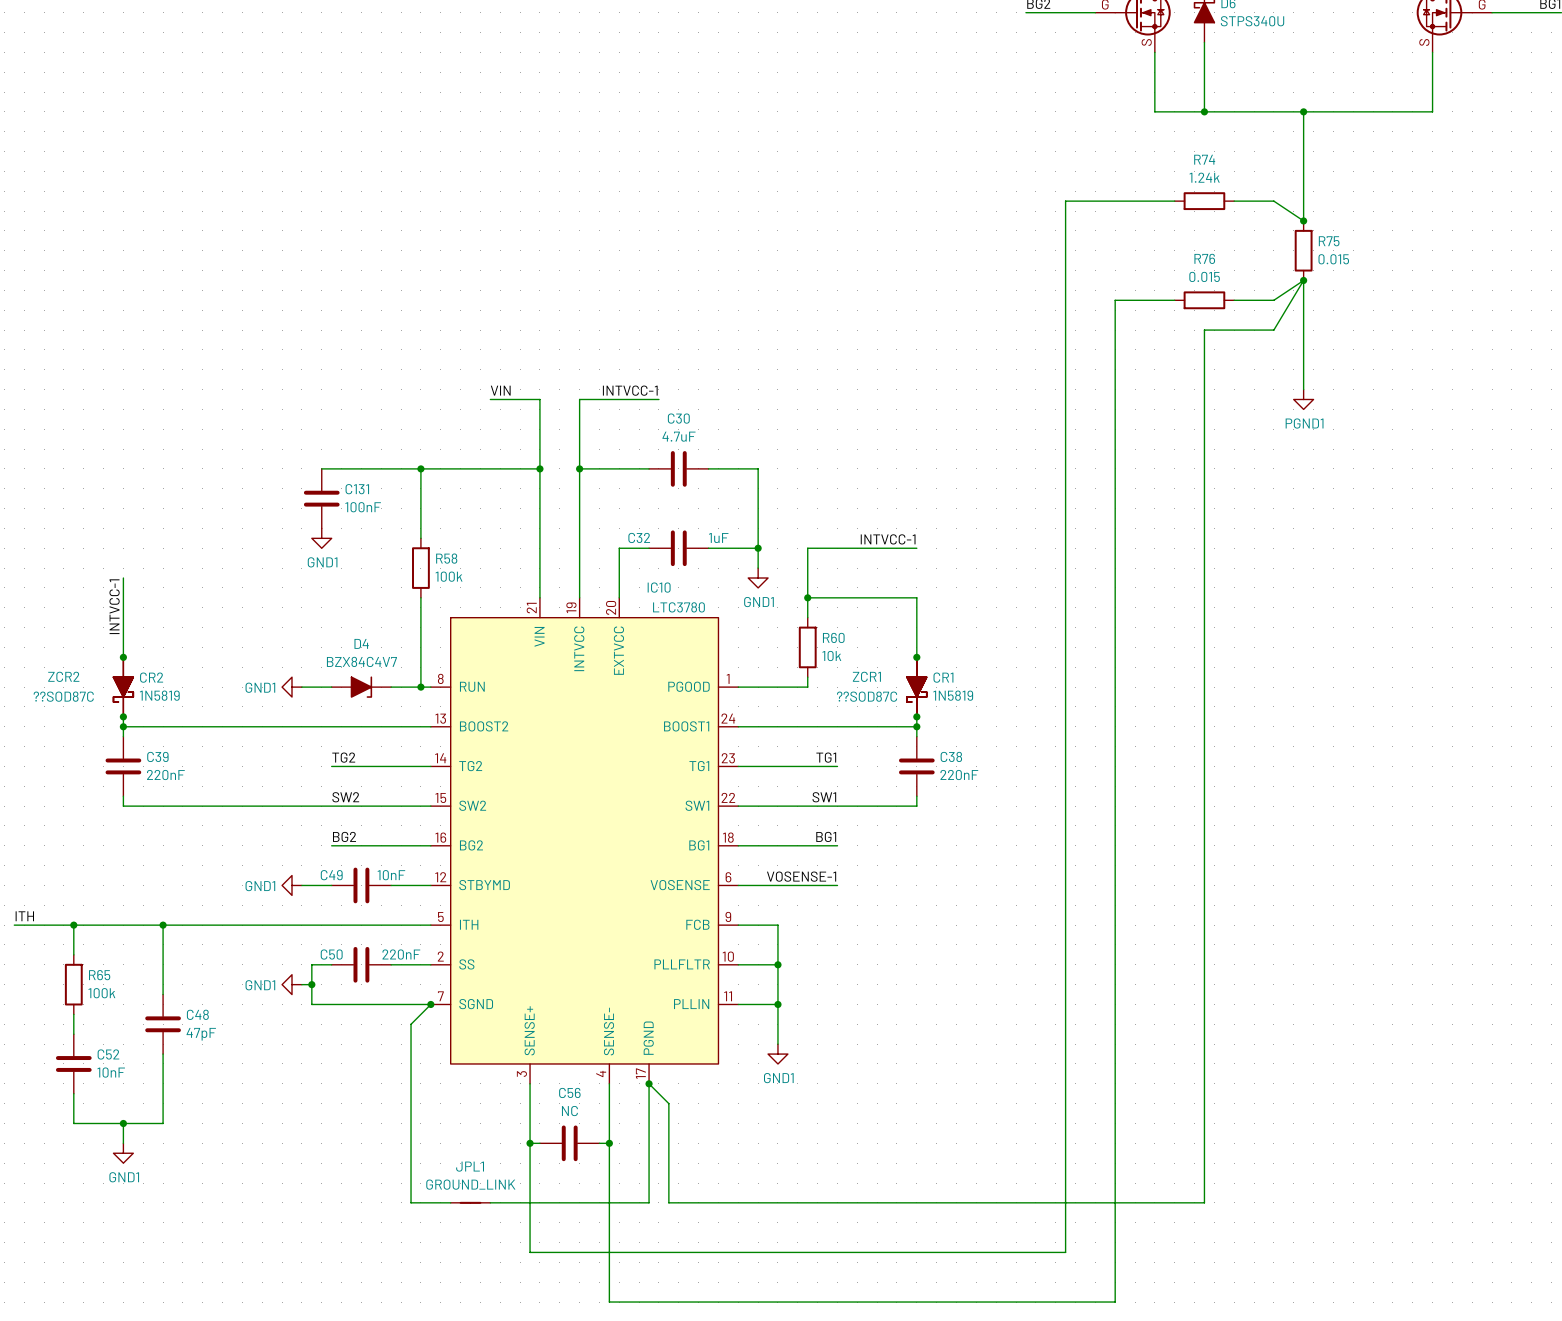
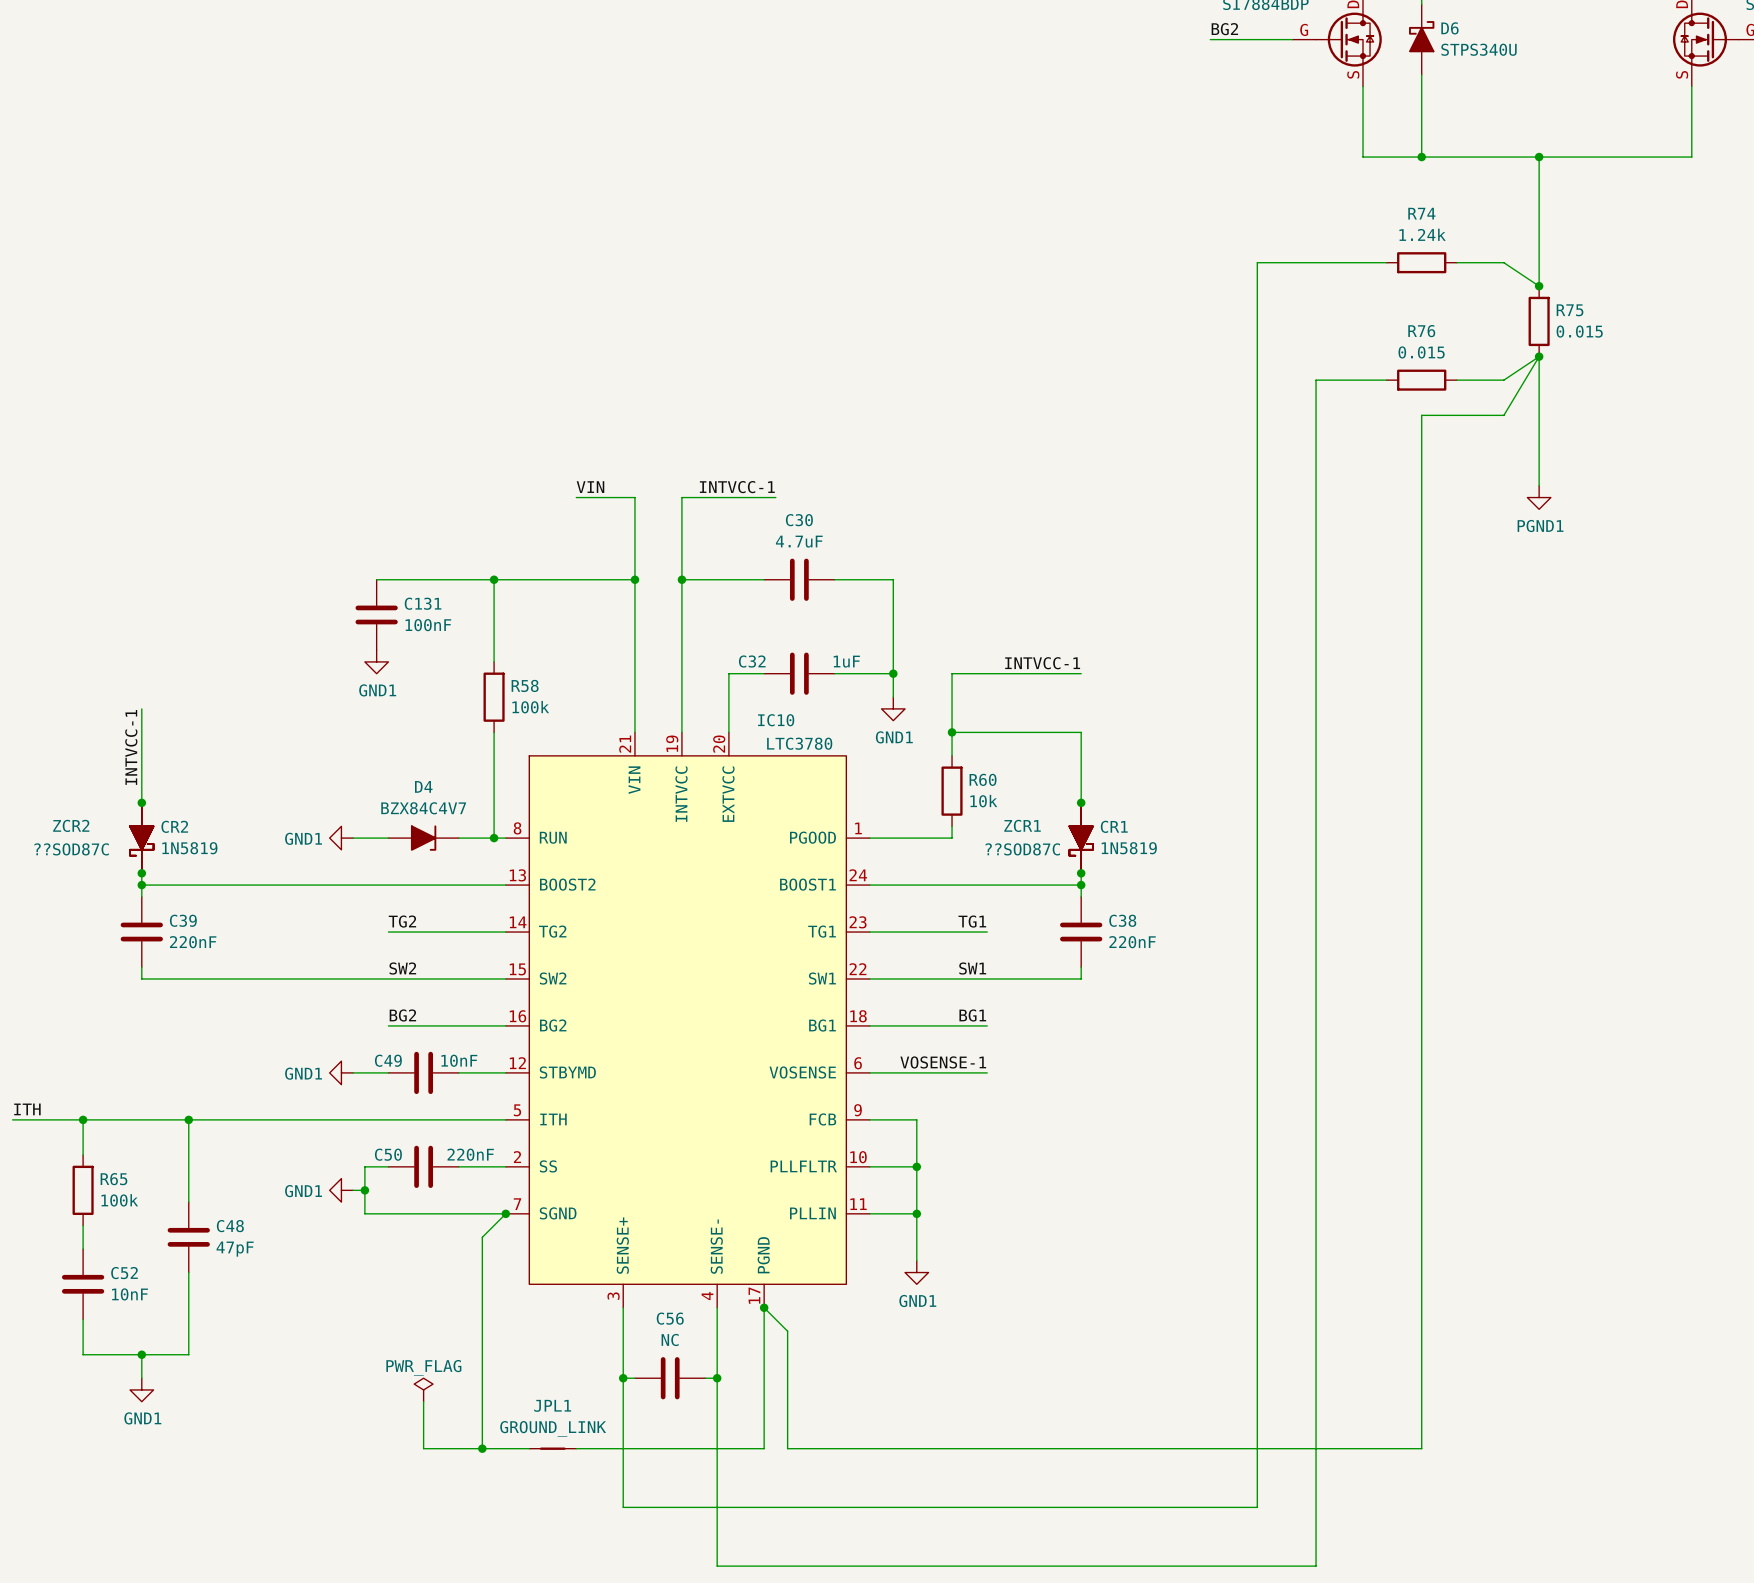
power symbol: none -> PWR_FLAG (423, 1389)
wire: none -> (423, 1401) (423, 1448) (482, 1448)
junction: none -> (482, 1448)

